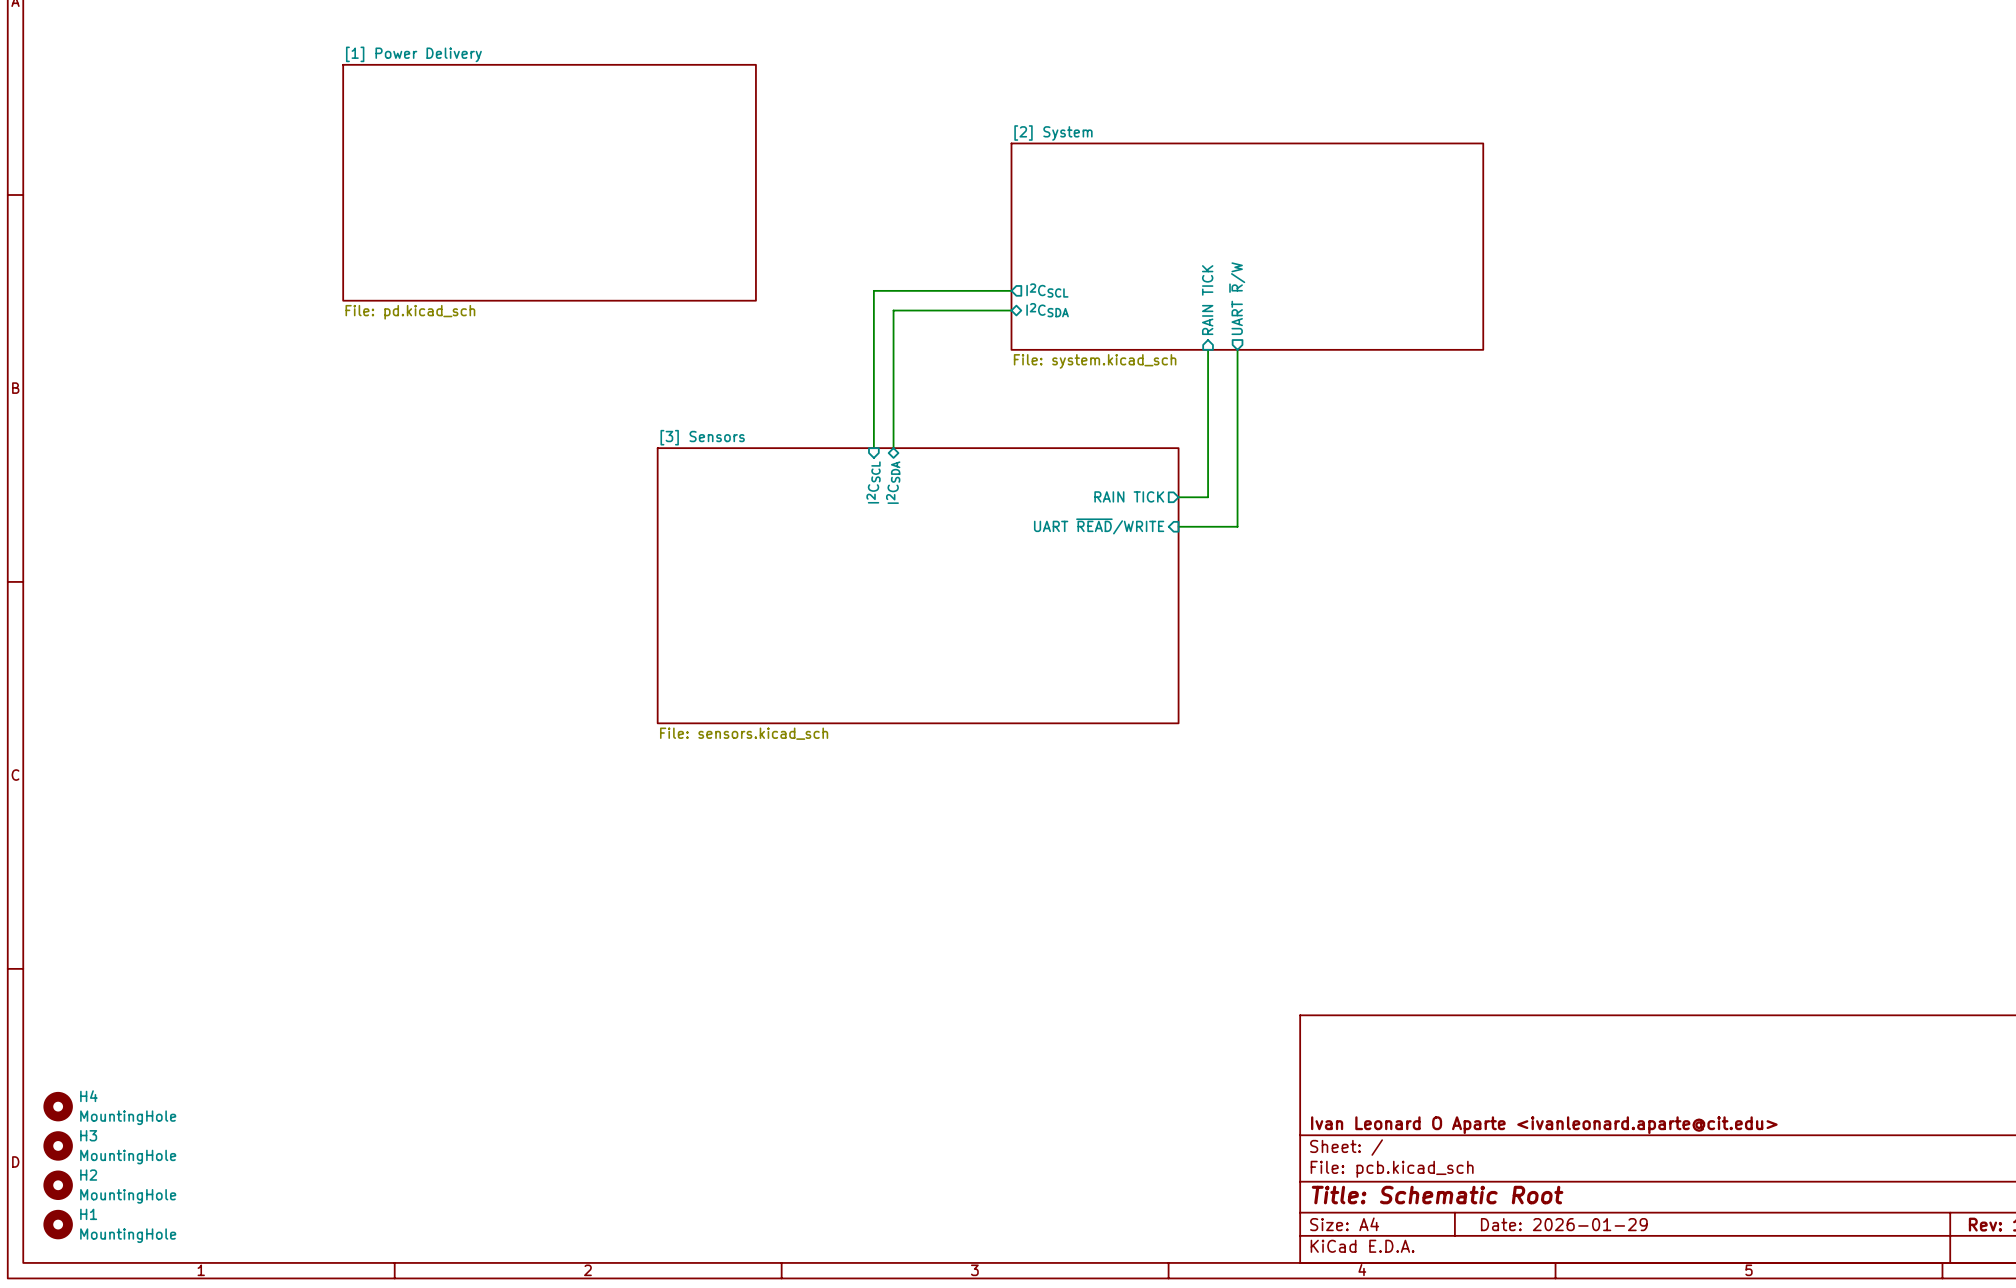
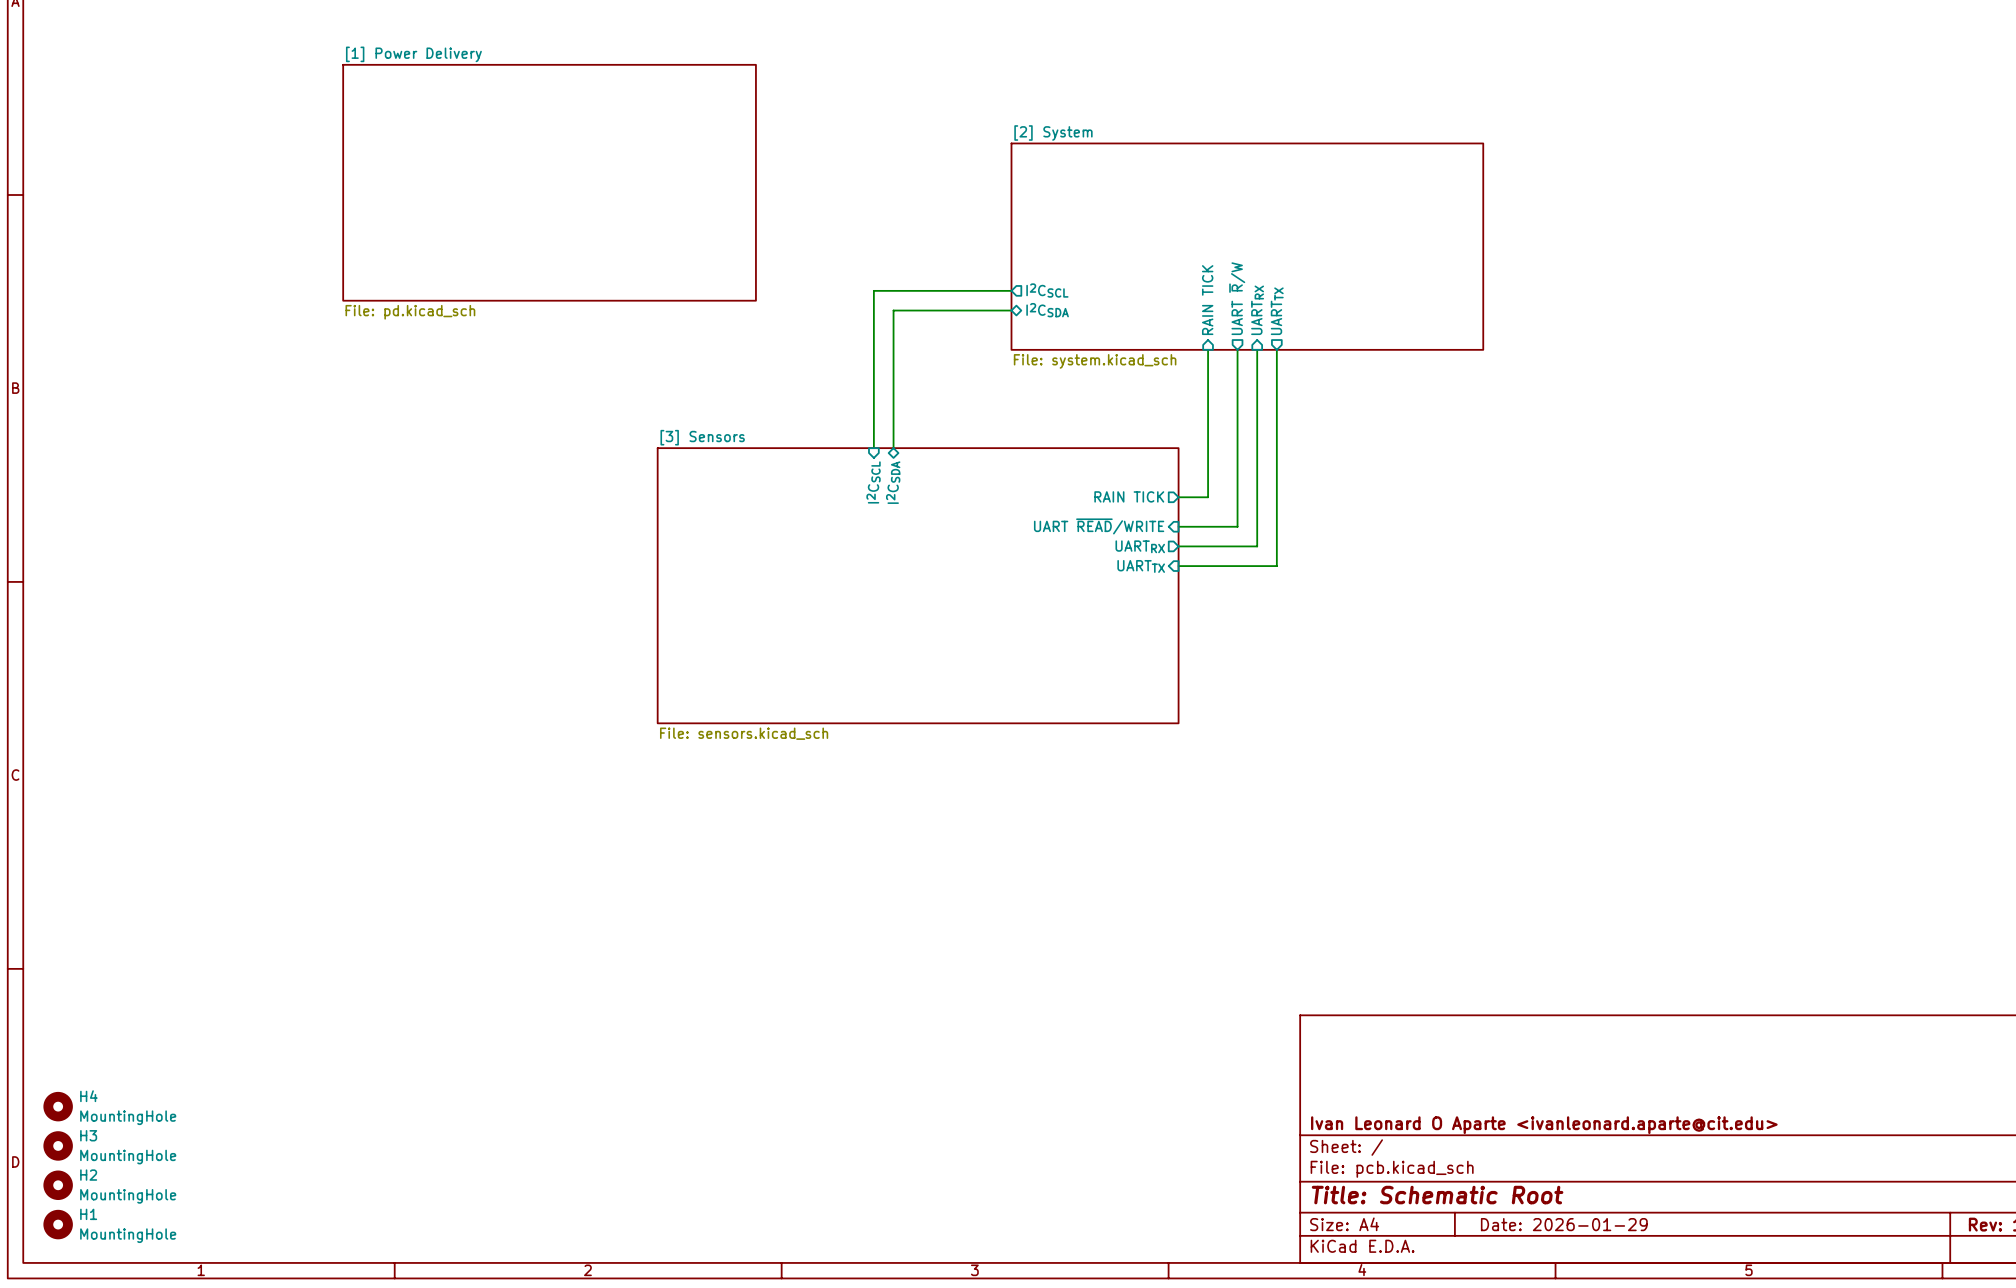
sheet pin: none -> UARTRX (1257, 310)
sheet pin: none -> UARTTX (1277, 311)
wire: none -> (1257, 349) (1257, 546) (1178, 546)
wire: none -> (1276, 349) (1276, 566) (1178, 566)
sheet pin: none -> UARTRX (1140, 546)
sheet pin: none -> UARTTX (1141, 566)

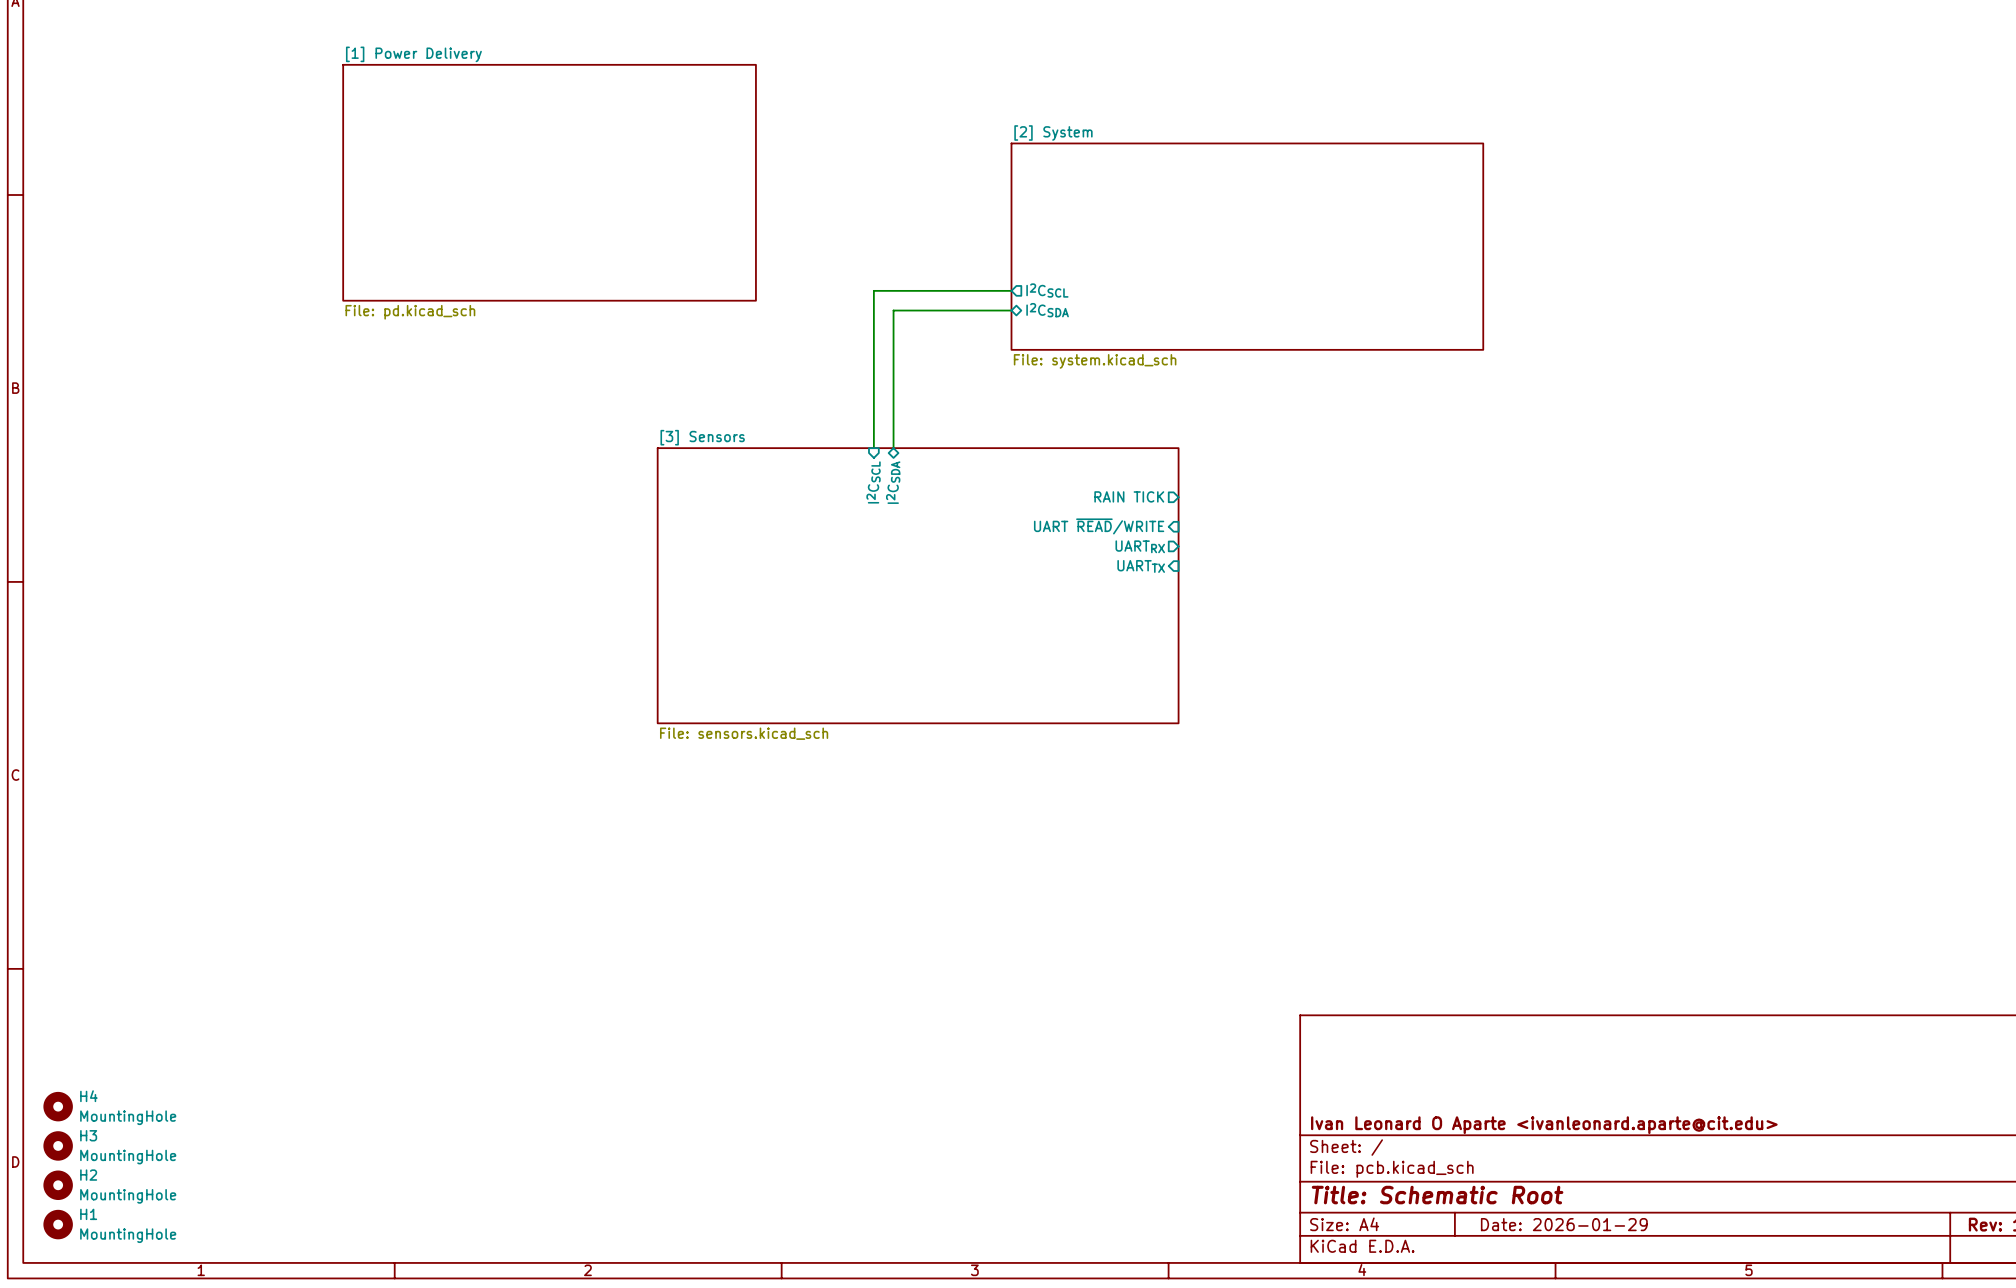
sheet pin: UART ~{R}/W (1237, 298) -> none
sheet pin: RAIN TICK (1207, 300) -> none
sheet pin: UARTRX (1257, 310) -> none
sheet pin: UARTTX (1277, 311) -> none
wire: (1208, 349) (1208, 497) (1178, 497) -> none
wire: (1237, 349) (1237, 526) (1178, 526) -> none
wire: (1257, 349) (1257, 546) (1178, 546) -> none
wire: (1276, 349) (1276, 566) (1178, 566) -> none

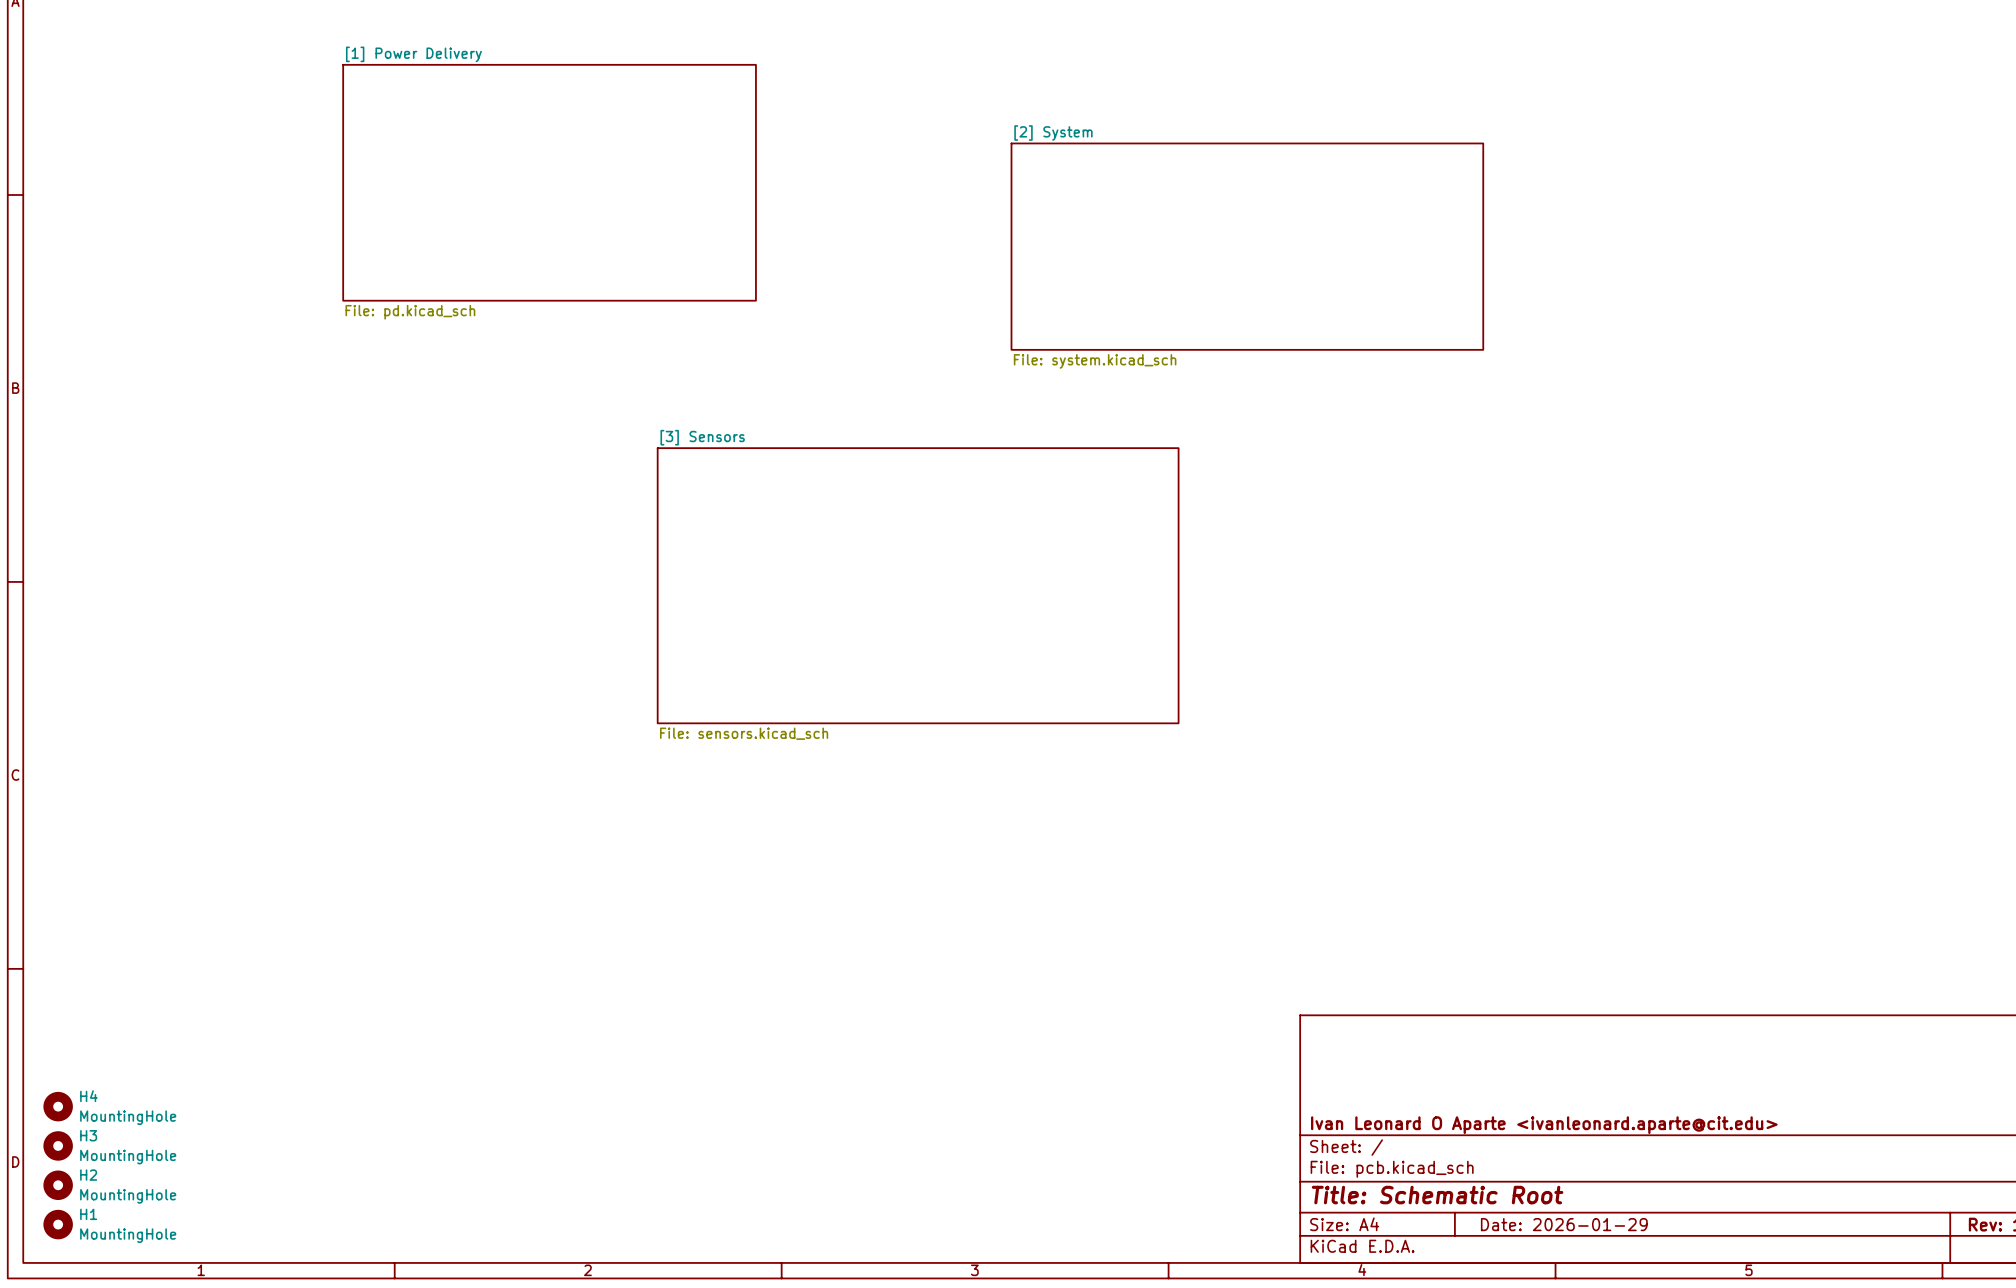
wire: (1011, 290) (873, 290) (873, 448) -> none
sheet pin: I2CSCL (1047, 290) -> none
wire: (1011, 310) (893, 310) (893, 448) -> none
sheet pin: I2CSDA (1047, 310) -> none
sheet pin: I2CSCL (873, 482) -> none
sheet pin: I2CSDA (893, 482) -> none
sheet pin: RAIN TICK (1129, 496) -> none
sheet pin: UART ~{READ}/WRITE (1099, 526) -> none
sheet pin: UARTRX (1140, 546) -> none
sheet pin: UARTTX (1141, 566) -> none

